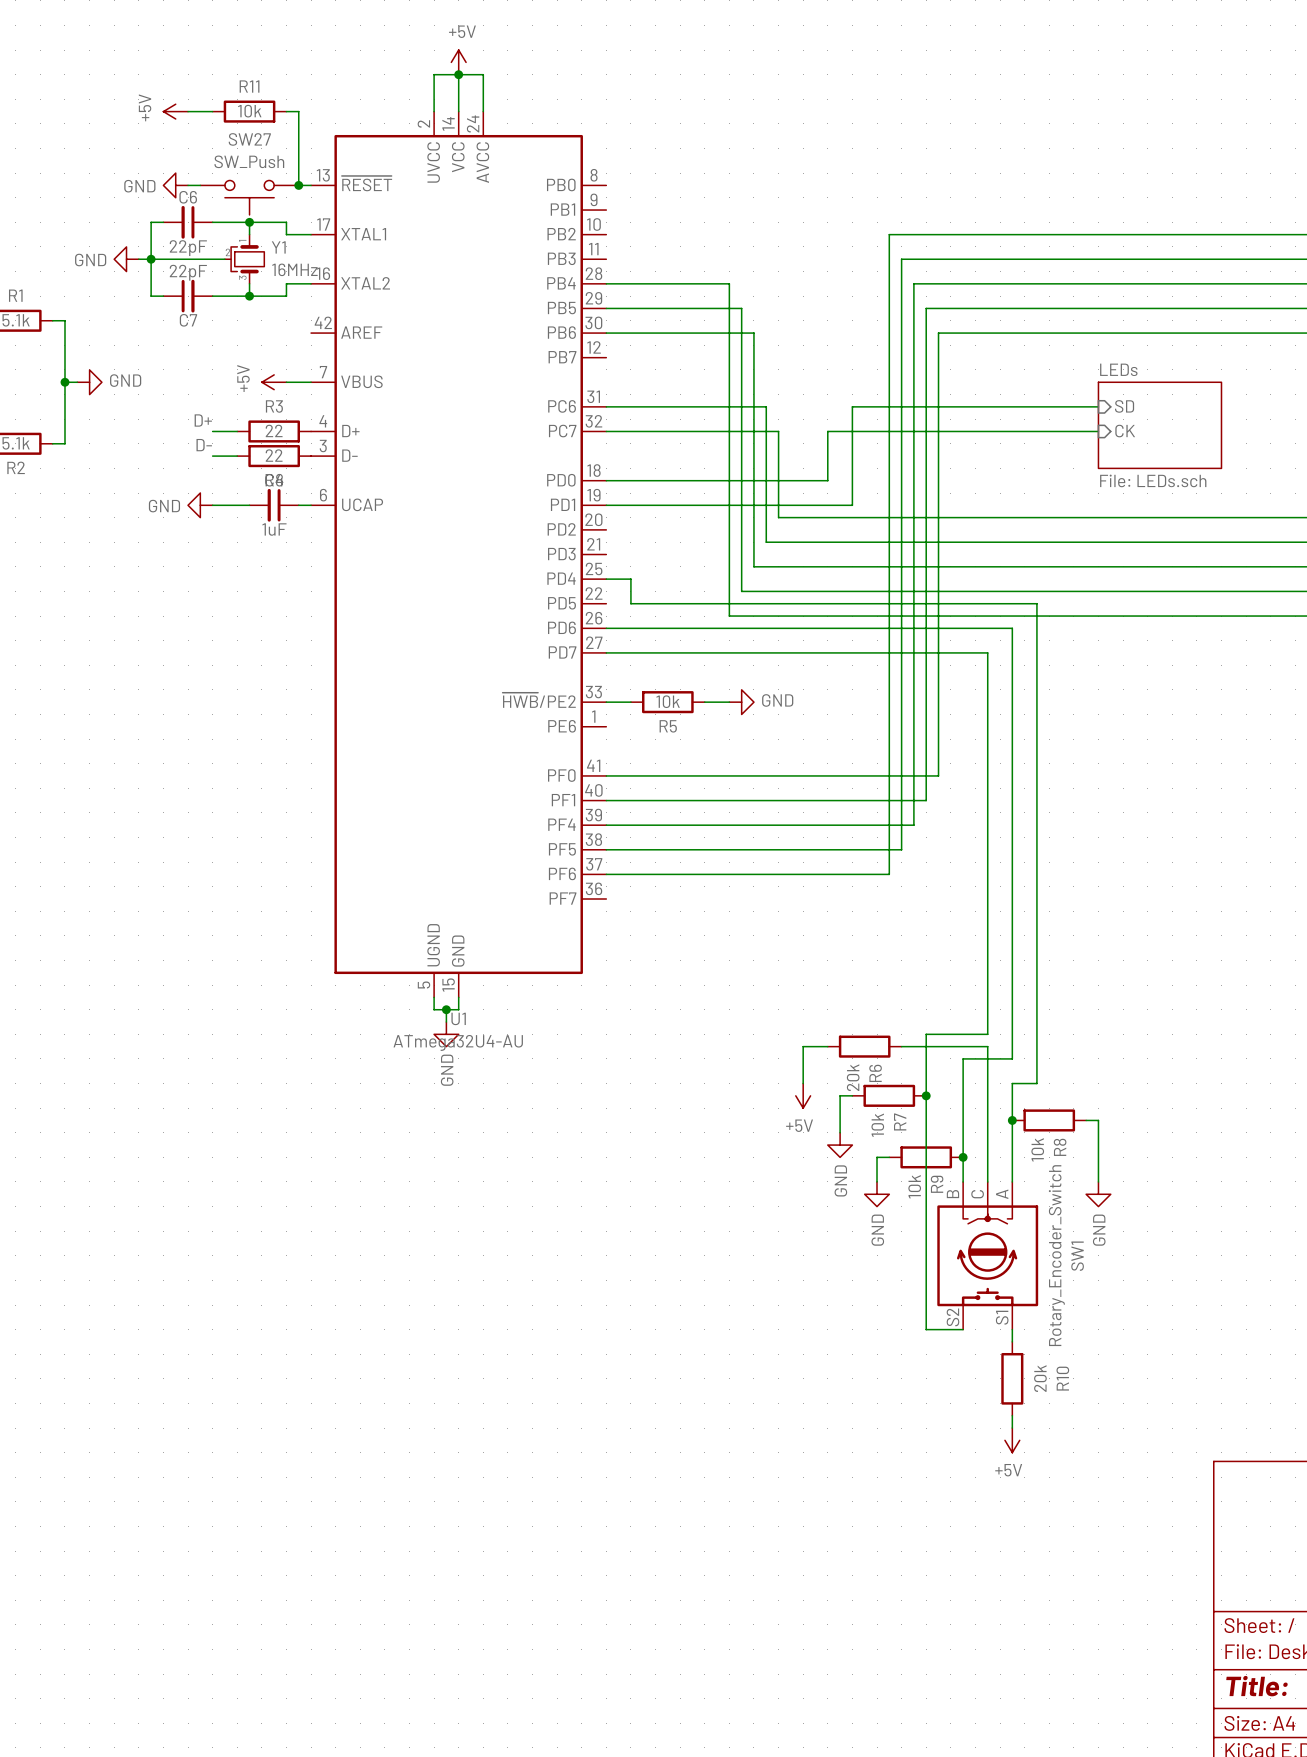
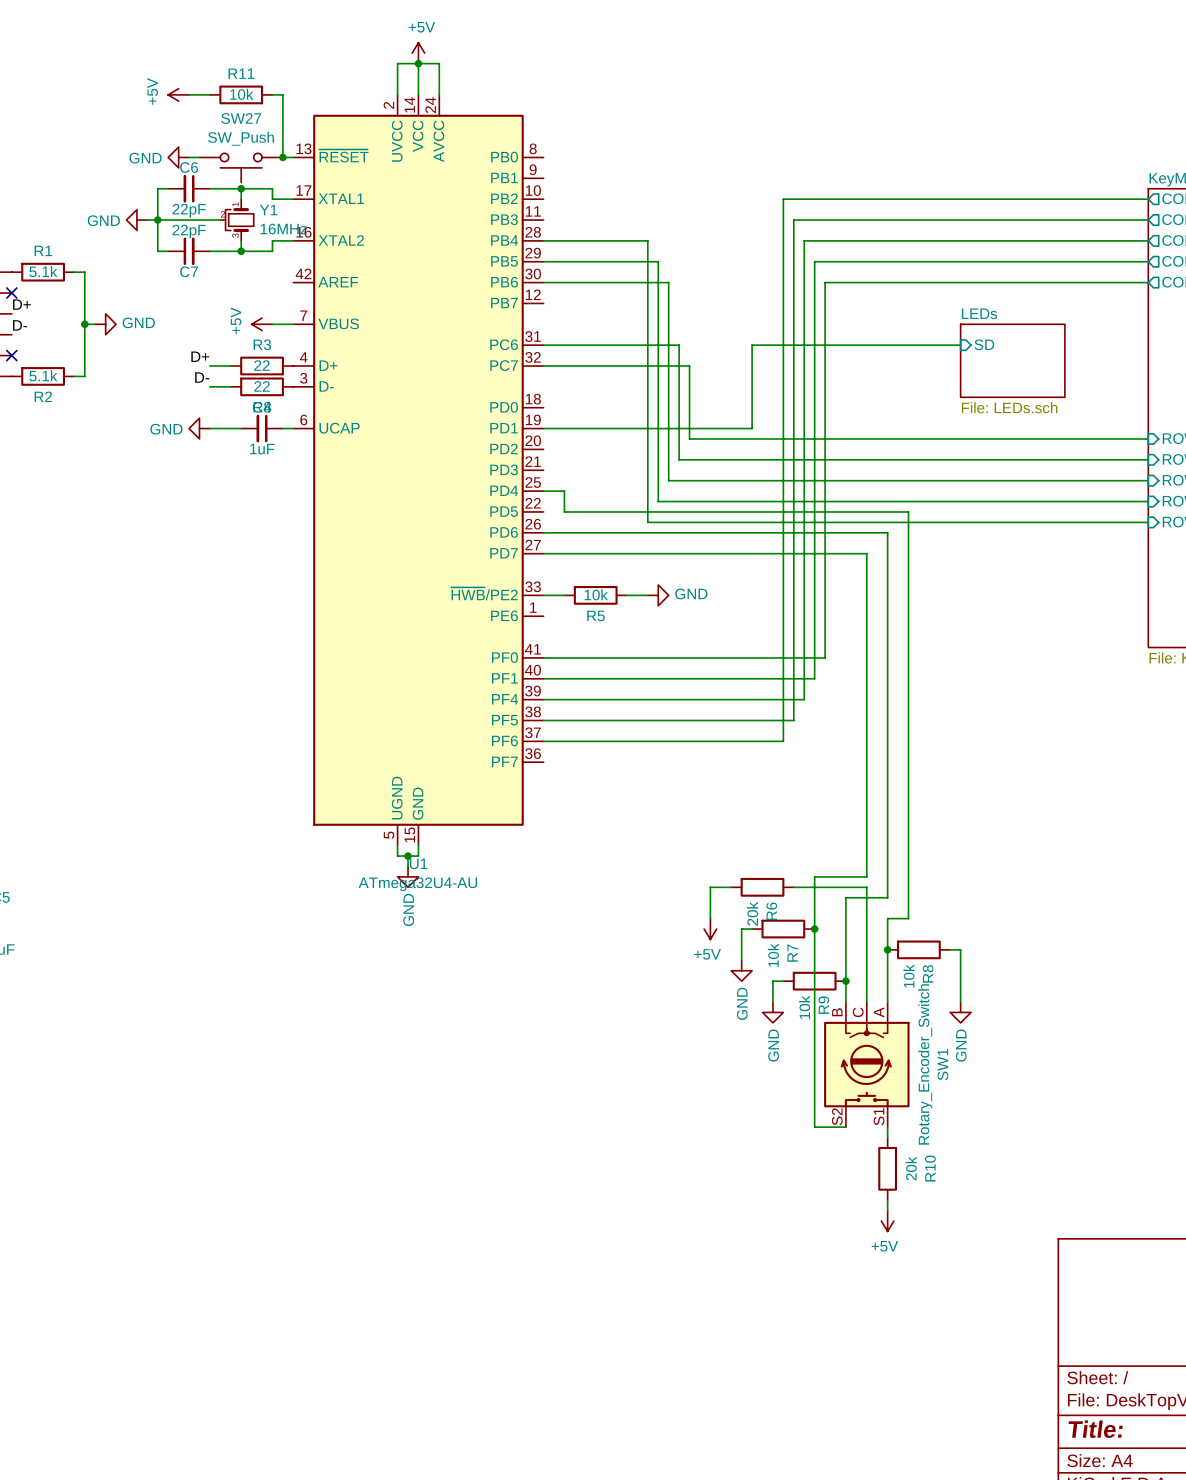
wire: (1098, 431) (827, 431) (827, 480) (606, 480) -> none
sheet pin: CK (1125, 431) -> none

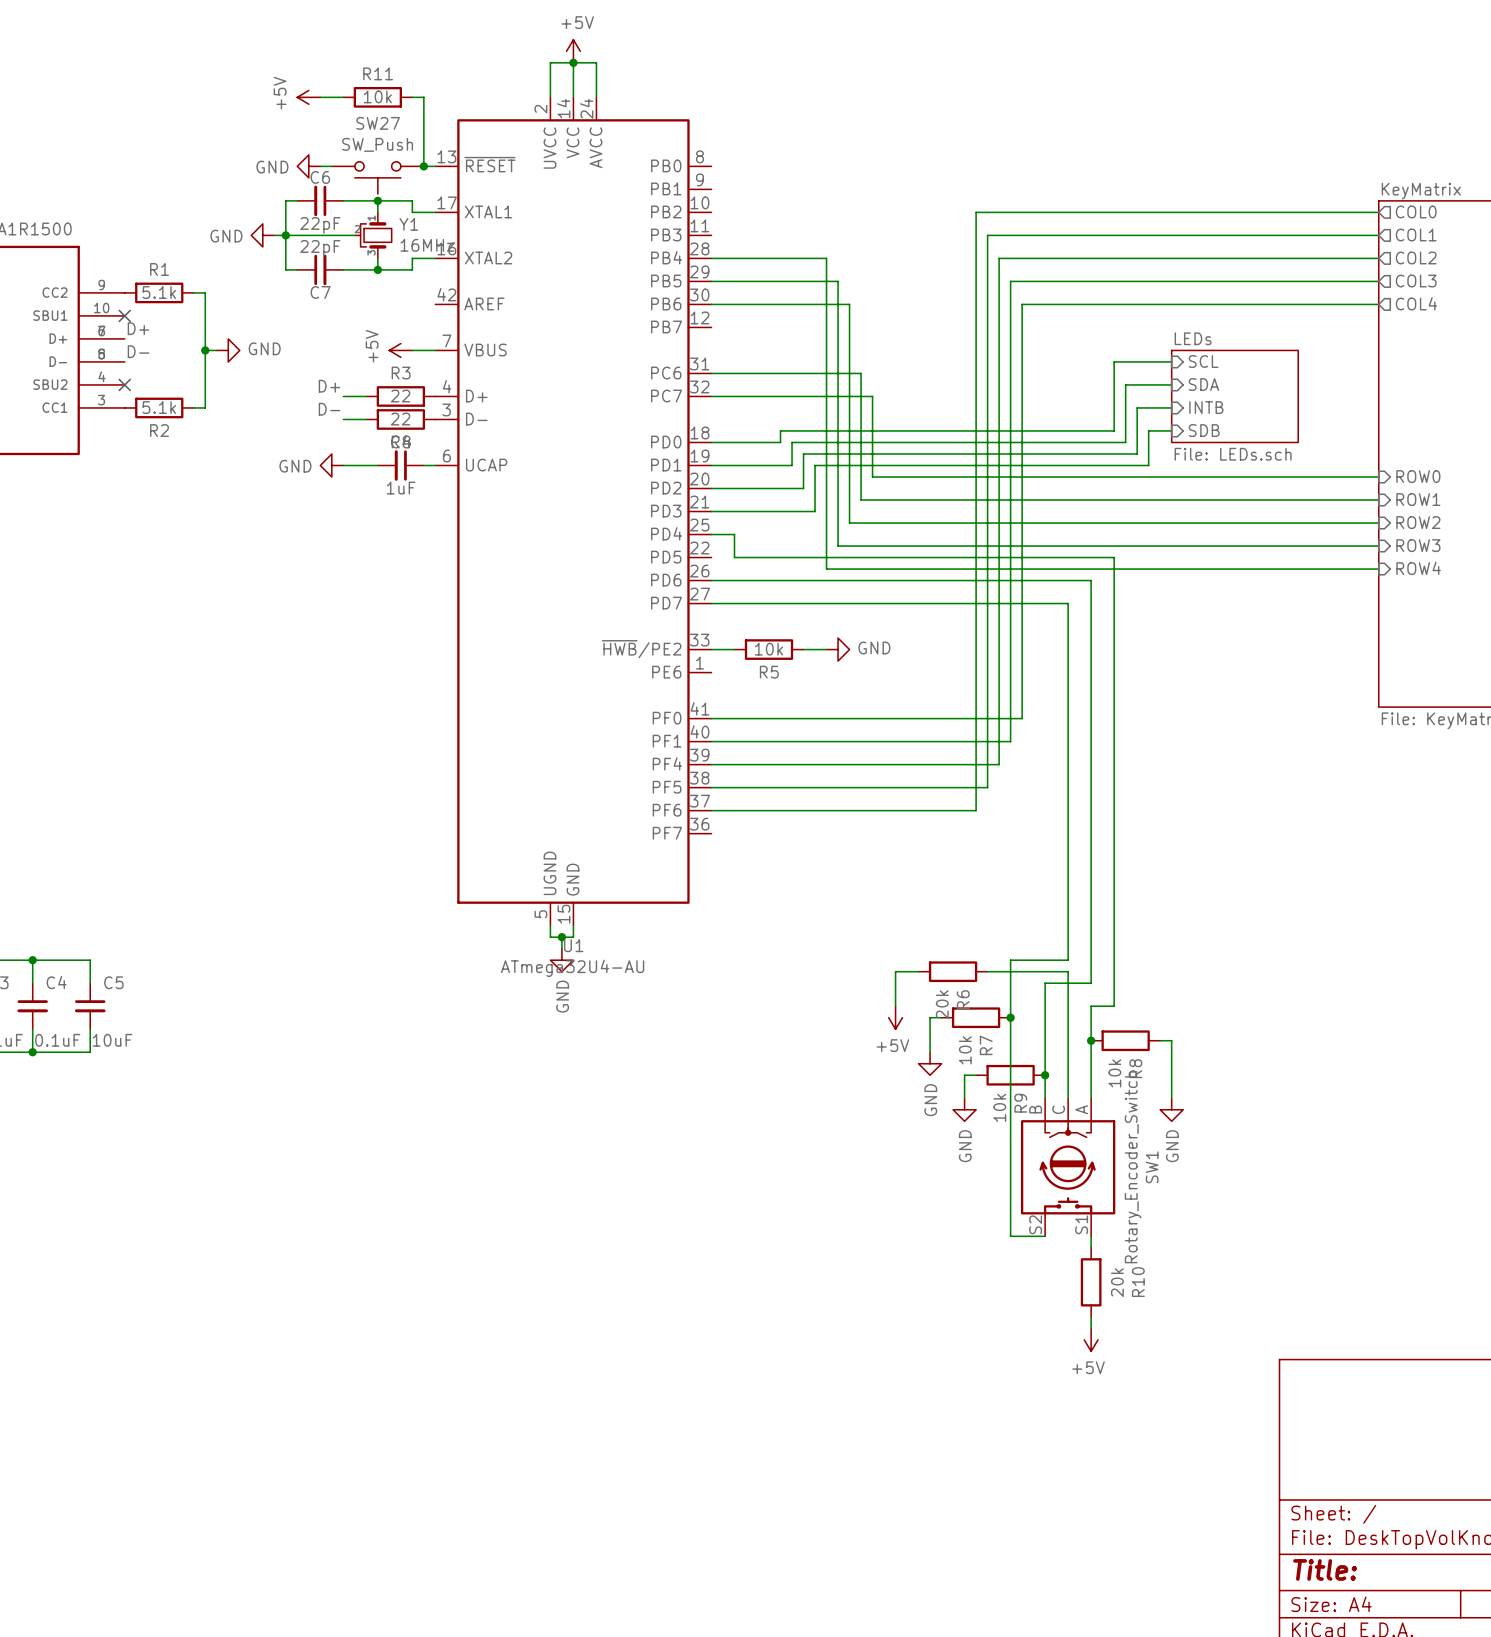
sheet LEDs shape: [960, 324, 1065, 398] -> [1171, 350, 1299, 443]
wire: none -> (1171, 361) (1114, 361) (1114, 430) (780, 430) (780, 442) (711, 442)
sheet pin: none -> SCL (1203, 361)
sheet pin: SD (984, 344) -> SDA (1203, 384)
wire: (960, 345) (752, 345) (752, 428) -> (1171, 430) (1148, 430) (1148, 465) (941, 465)
wire: none -> (1171, 384) (1125, 384) (1125, 442) (792, 442) (792, 465)
wire: none -> (1171, 407) (1137, 407) (1137, 453) (803, 453) (803, 488) (711, 488)
sheet pin: none -> INTB (1206, 407)
sheet pin: none -> SDB (1204, 430)
wire: (616, 428) (637, 428) -> (711, 511) (815, 511) (815, 465)

